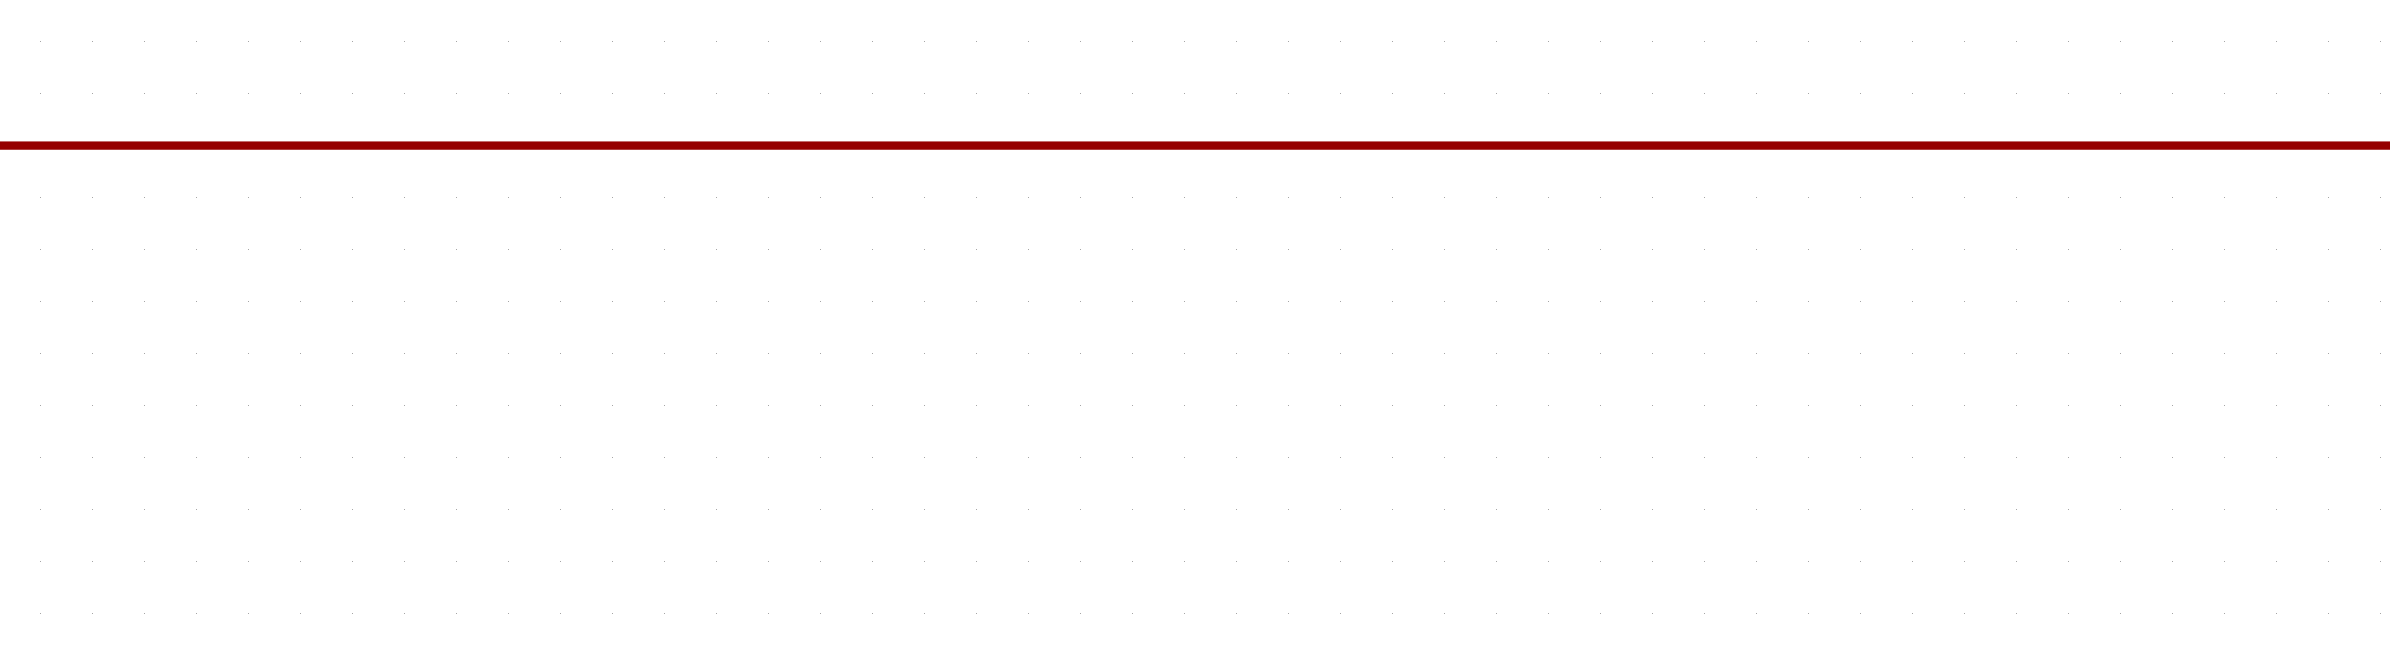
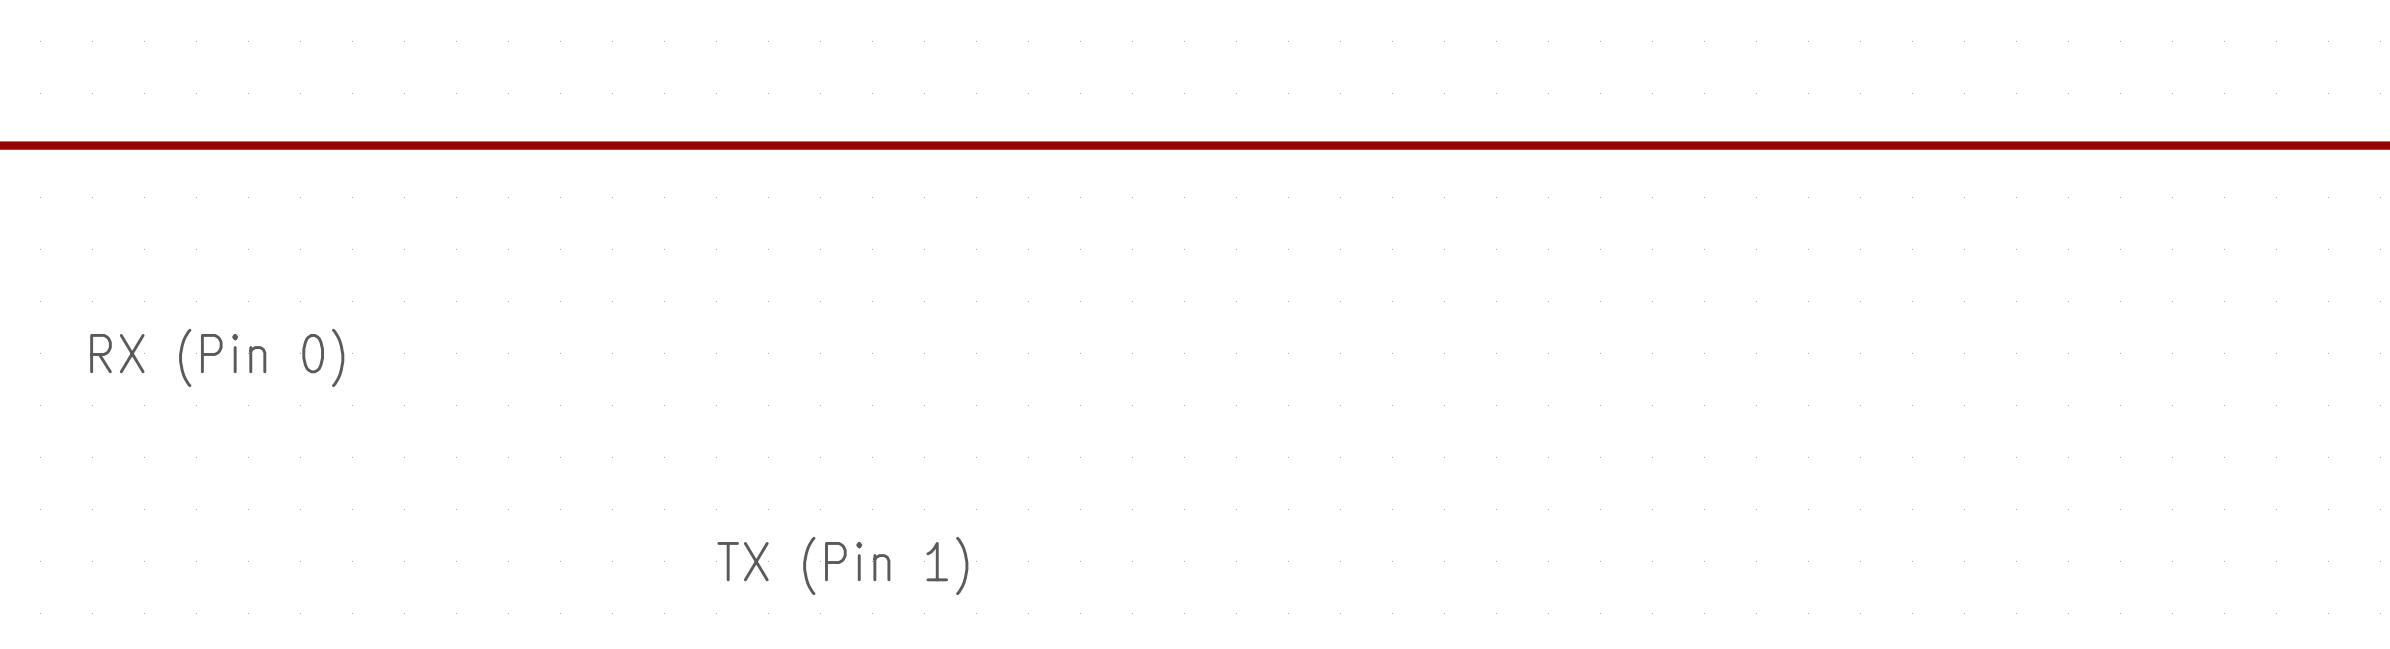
text: none -> RX (Pin 0) (217, 357)
text: none -> TX (Pin 1) (842, 565)

